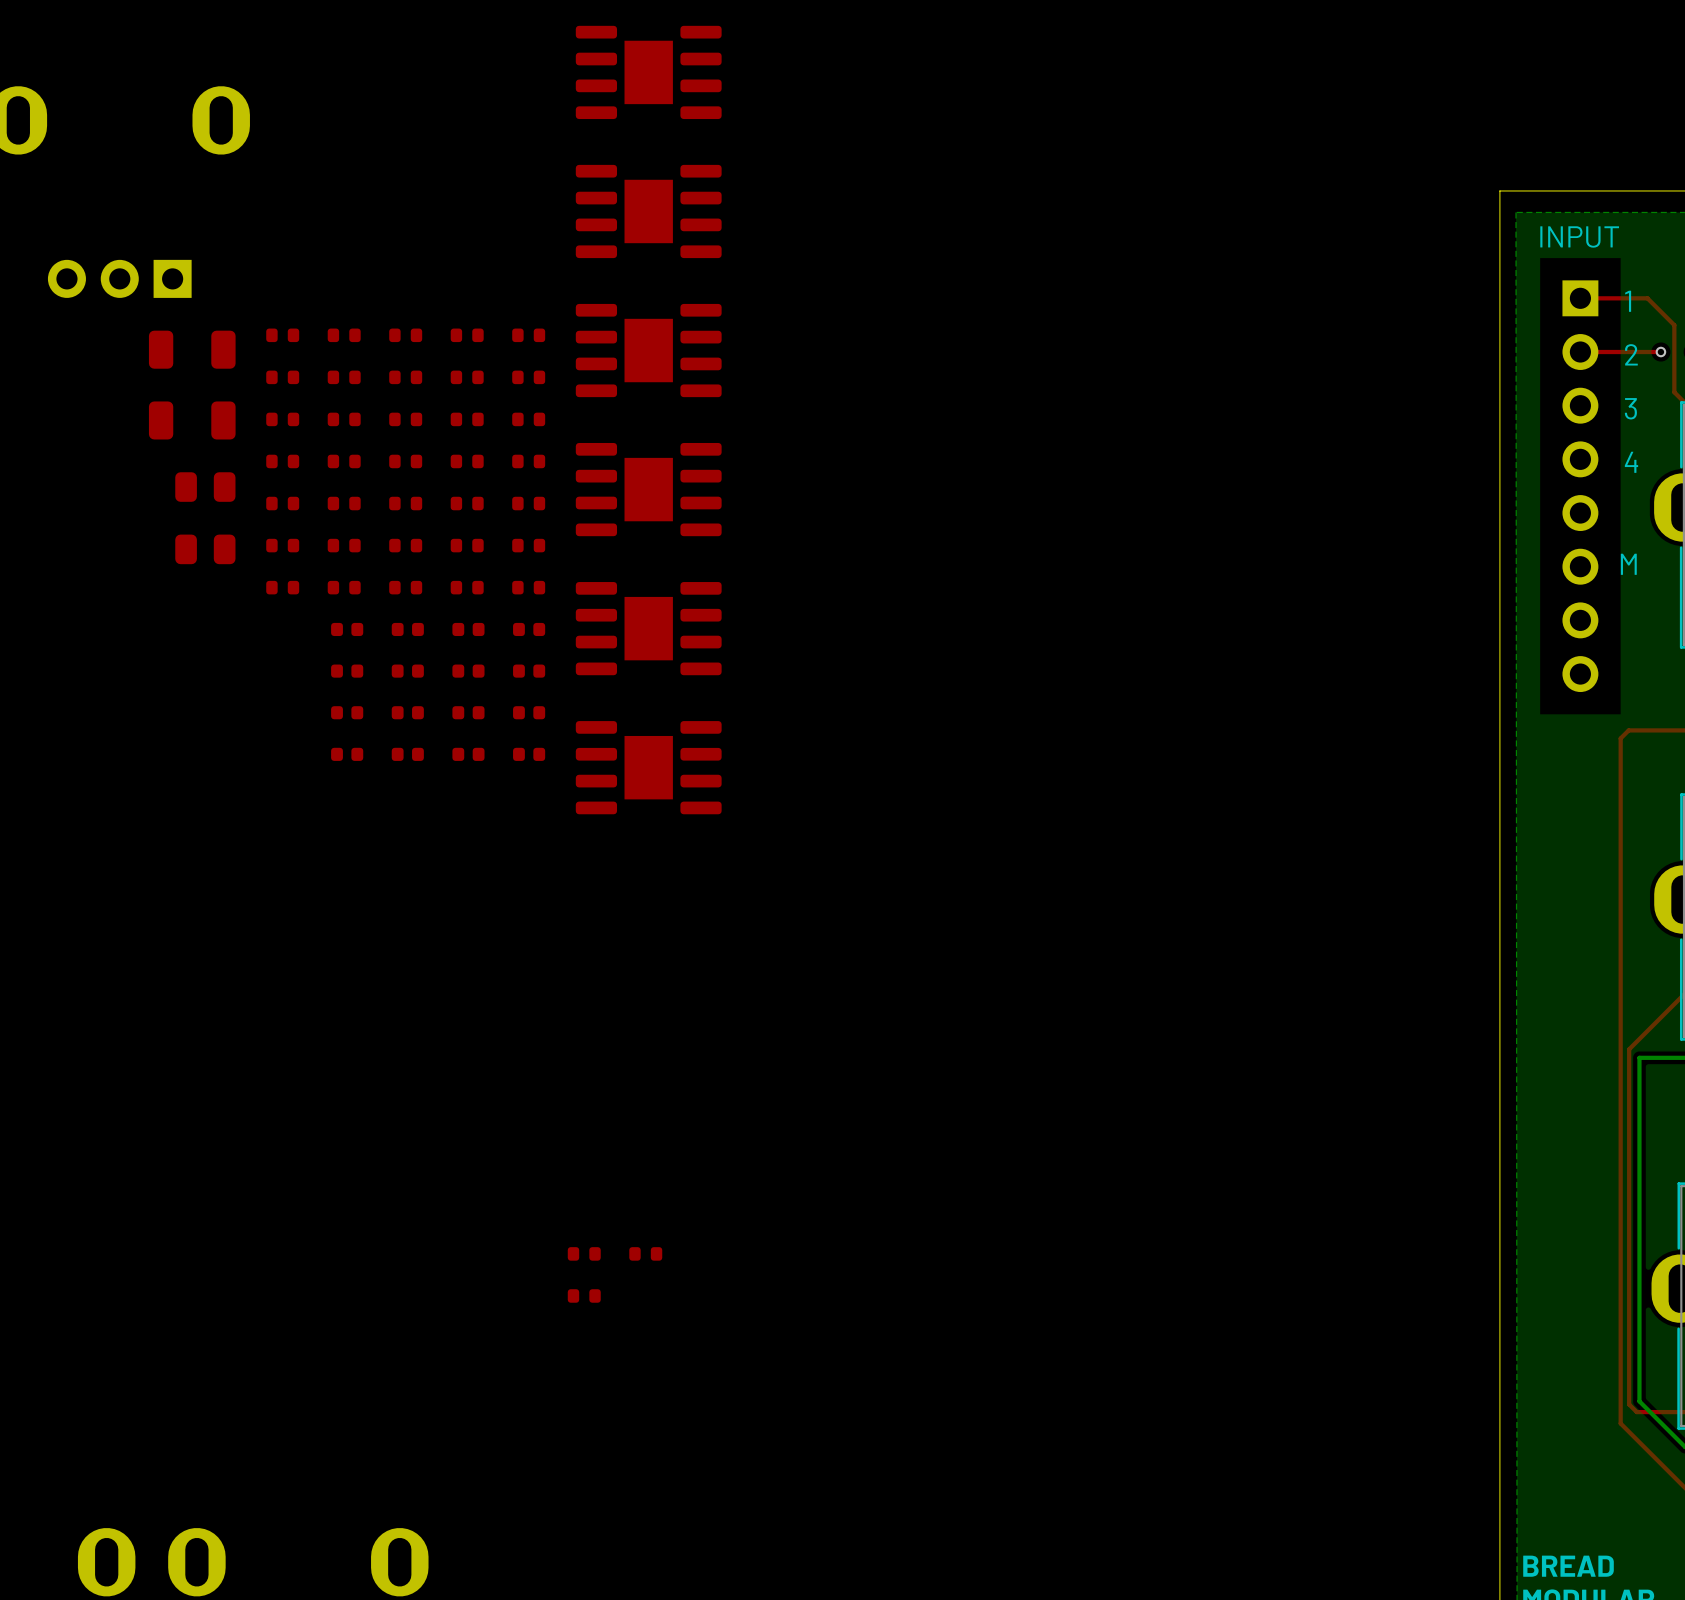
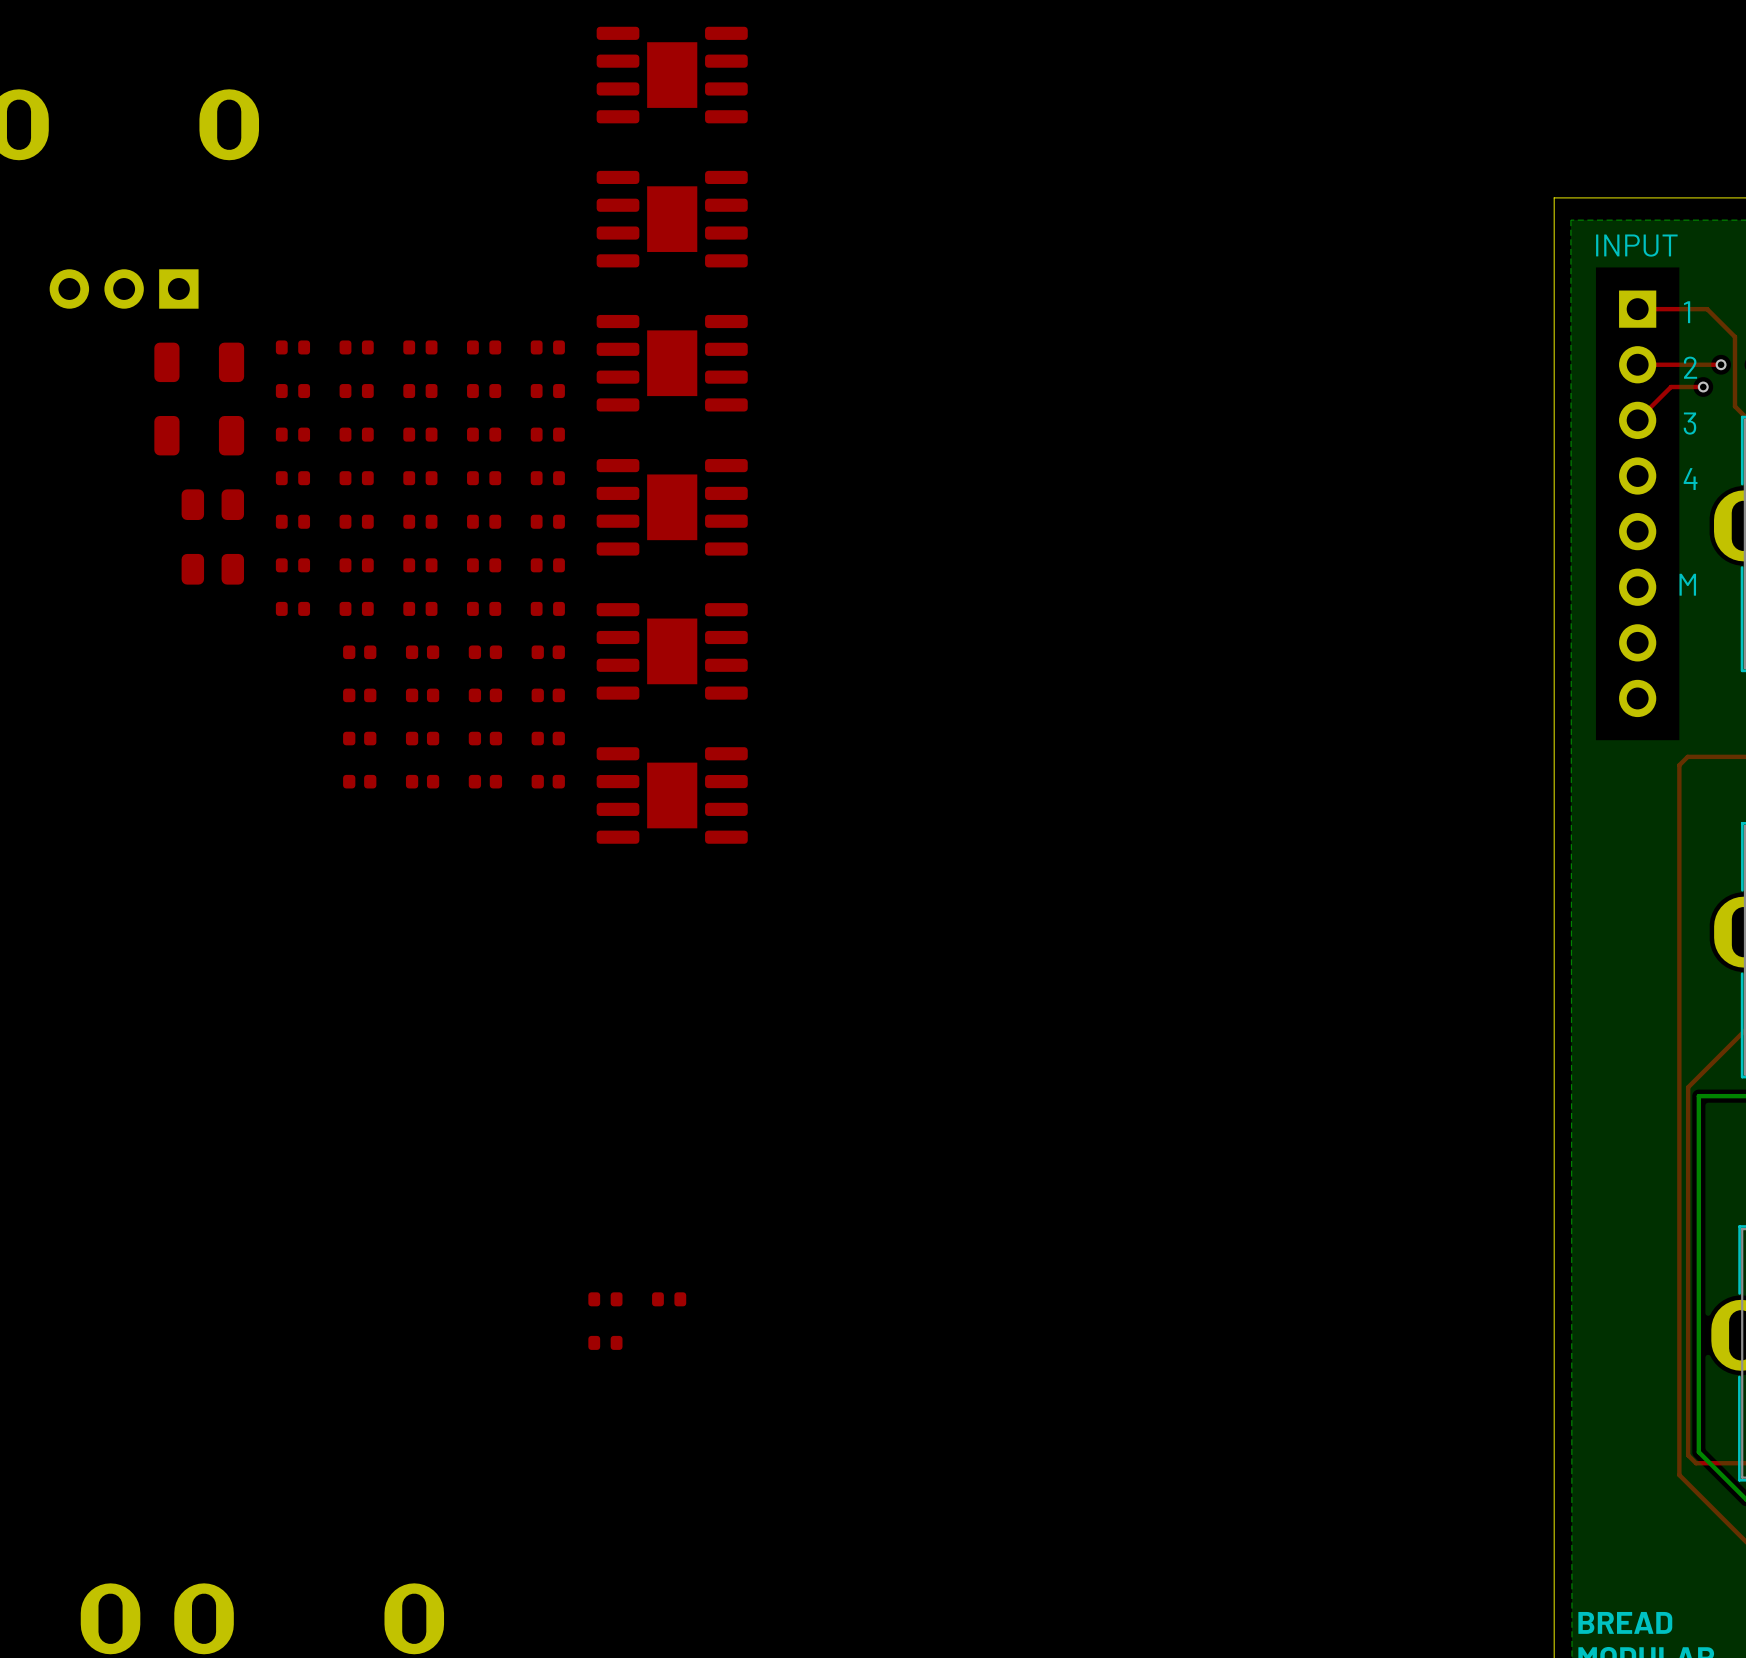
top track: none -> (1703, 387) (1671, 387) (1637, 420)
via: none -> (1703, 387)

